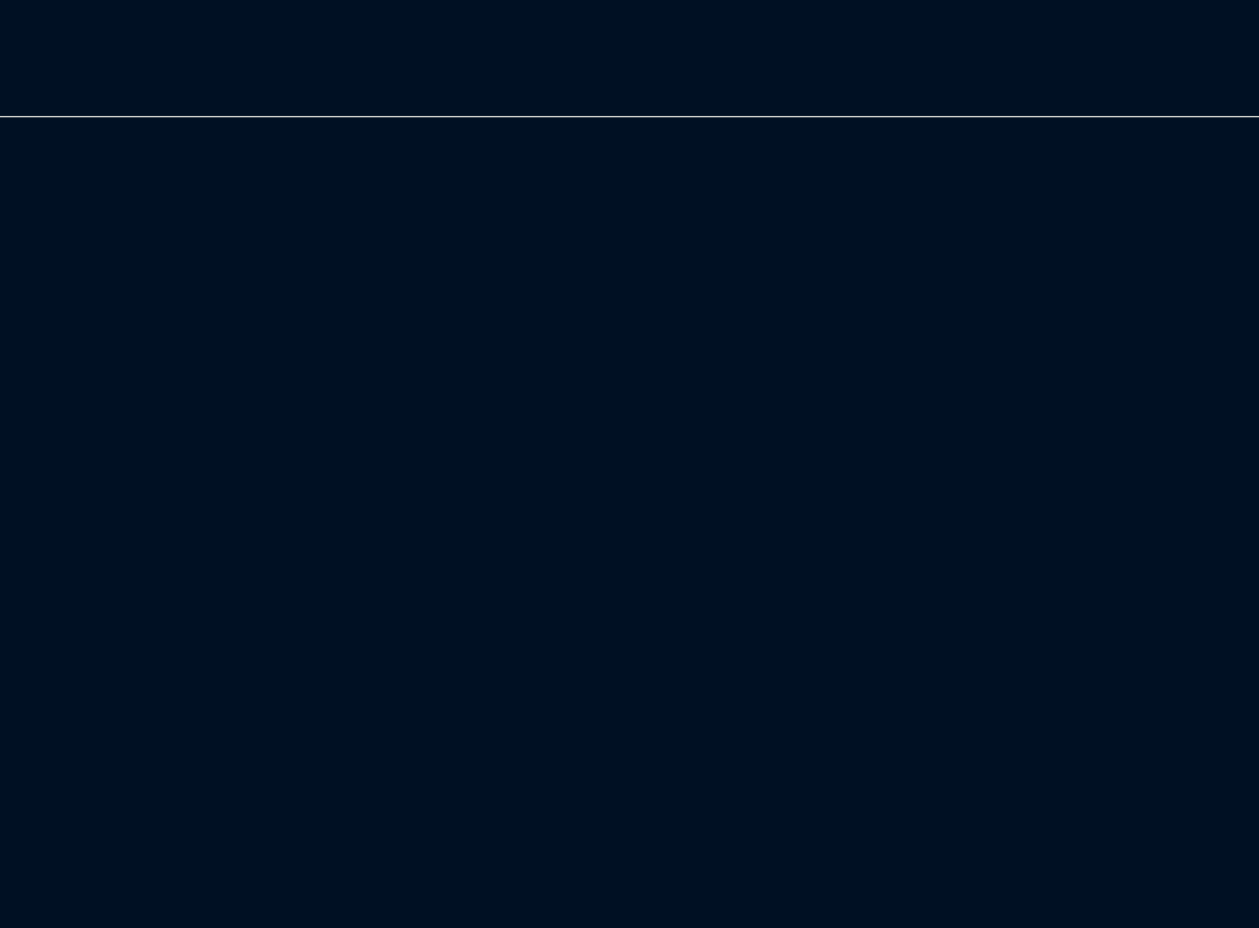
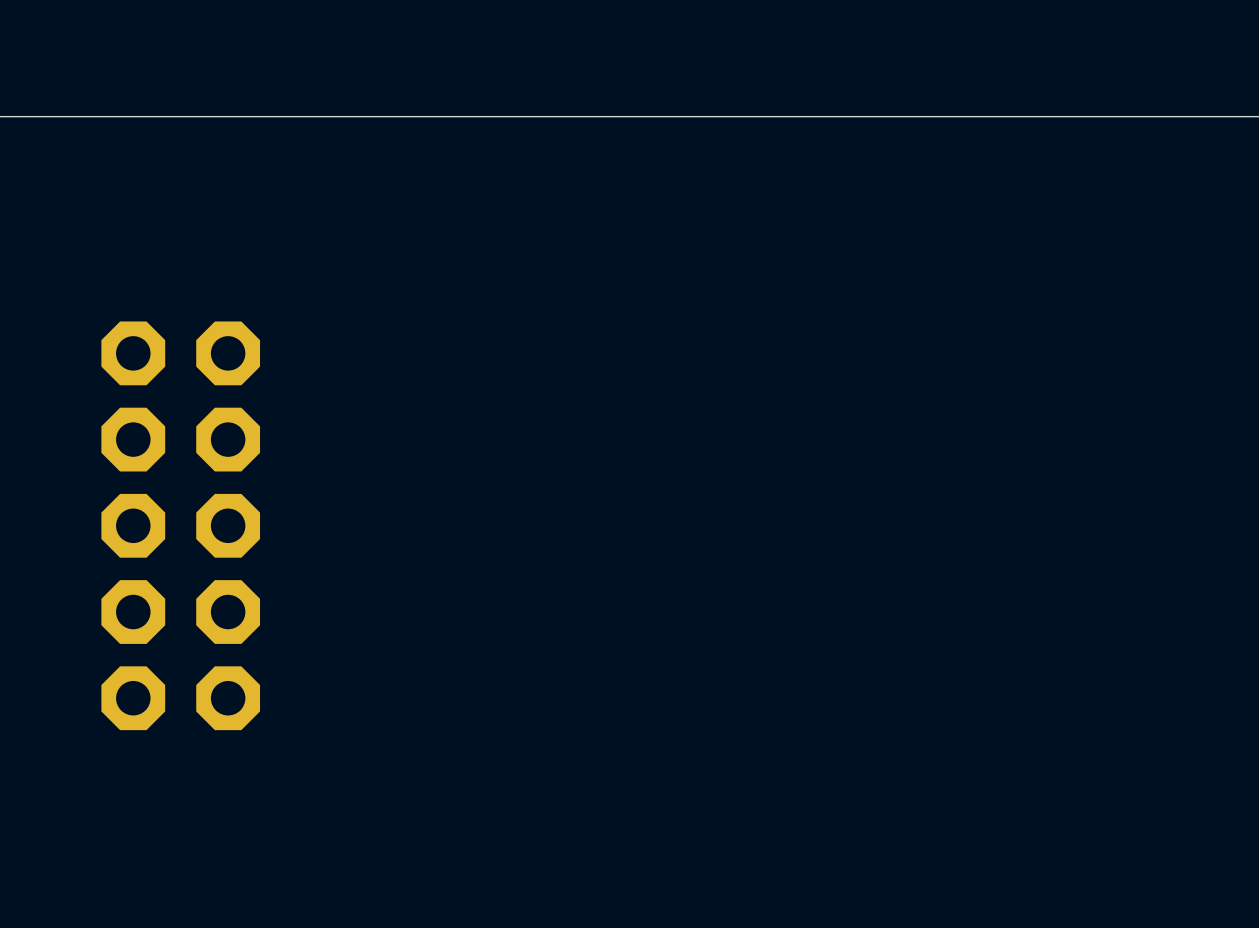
part: none -> (180, 525)

